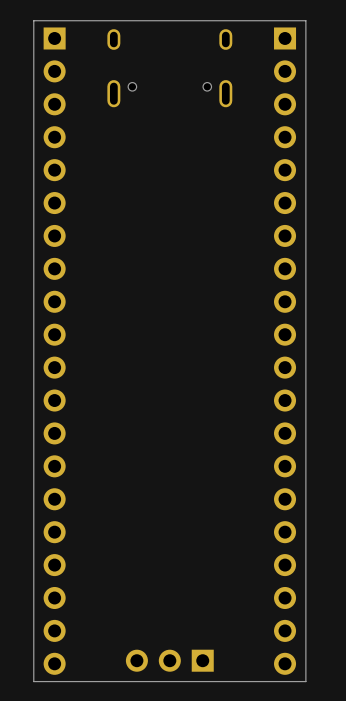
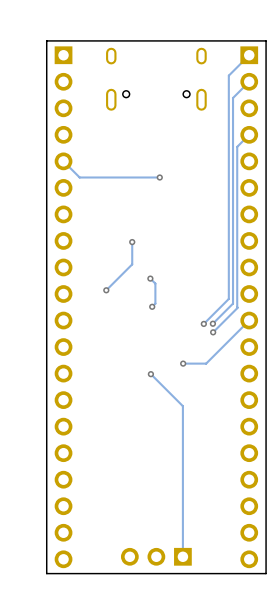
track: none -> (249, 55) (228, 75) (228, 298) (203, 323)
track: none -> (249, 81) (233, 97) (233, 303) (212, 323)
track: none -> (249, 134) (237, 146) (237, 308) (213, 332)
track: none -> (63, 161) (79, 177) (159, 177)
via: none -> (159, 177)
track: none -> (132, 242) (132, 264) (106, 290)
via: none -> (132, 242)
track: none -> (150, 278) (155, 283) (155, 303) (152, 306)
via: none -> (150, 278)
via: none -> (106, 290)
via: none -> (152, 306)
track: none -> (249, 320) (206, 363) (183, 363)
via: none -> (203, 323)
via: none -> (212, 323)
via: none -> (213, 332)
via: none -> (183, 363)
track: none -> (150, 374) (182, 406) (182, 556)
via: none -> (150, 374)

